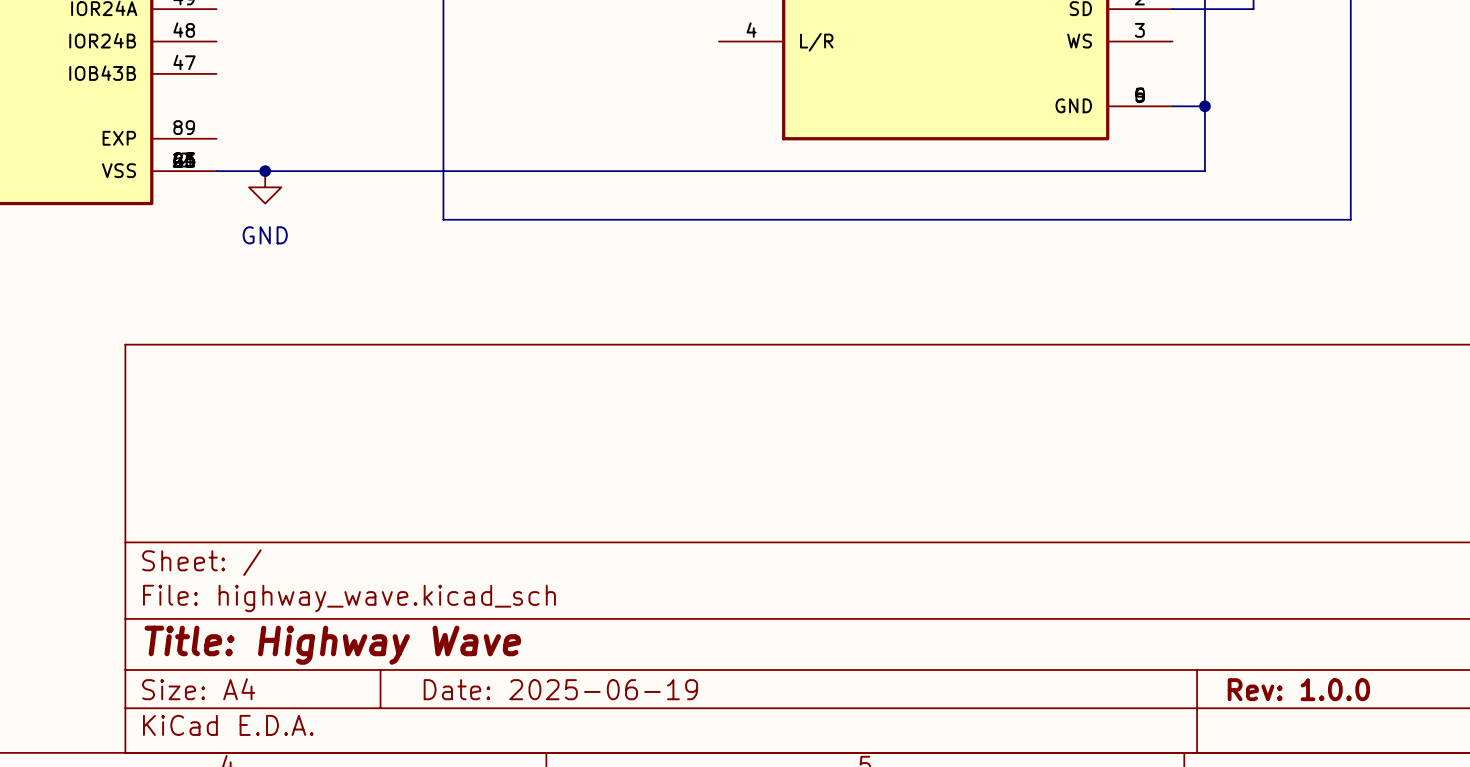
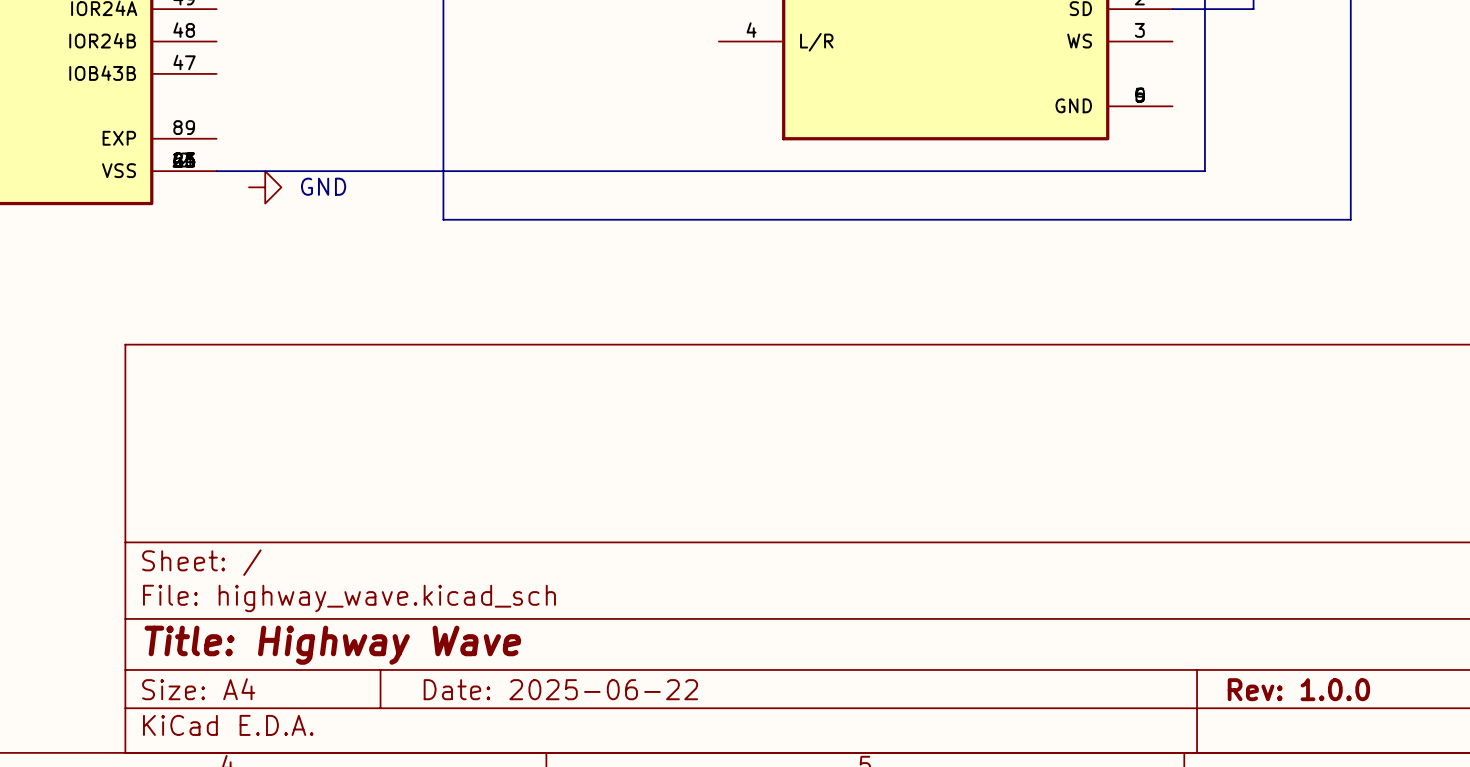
wire: (1172, 106) (1204, 106) -> none
junction: (1204, 106) -> none
junction: (265, 171) -> none
power symbol rotation: 0° (265, 187) -> 90° counterclockwise (265, 187)
title block: Date: 2025-06-19 (560, 689) -> Date: 2025-06-22 (560, 689)

